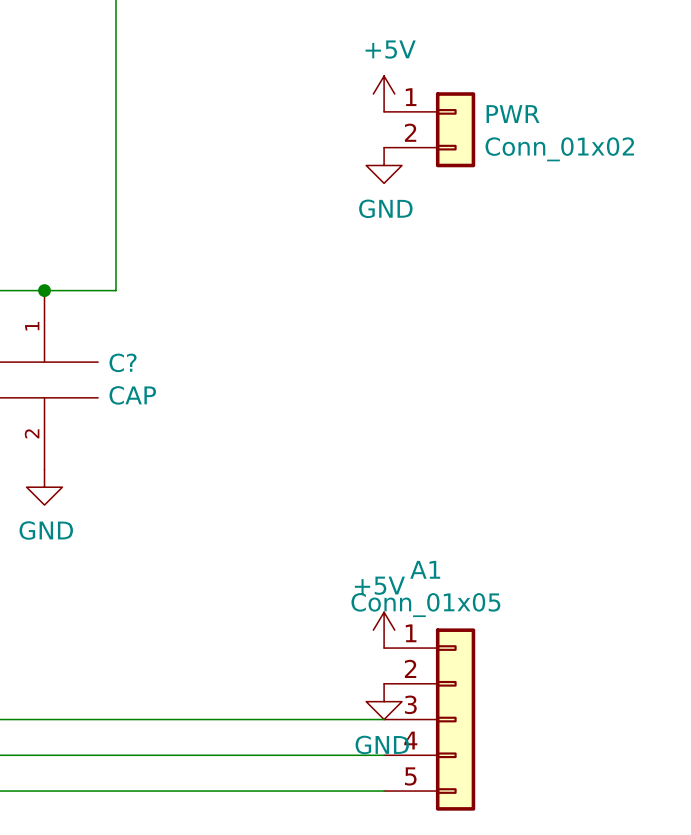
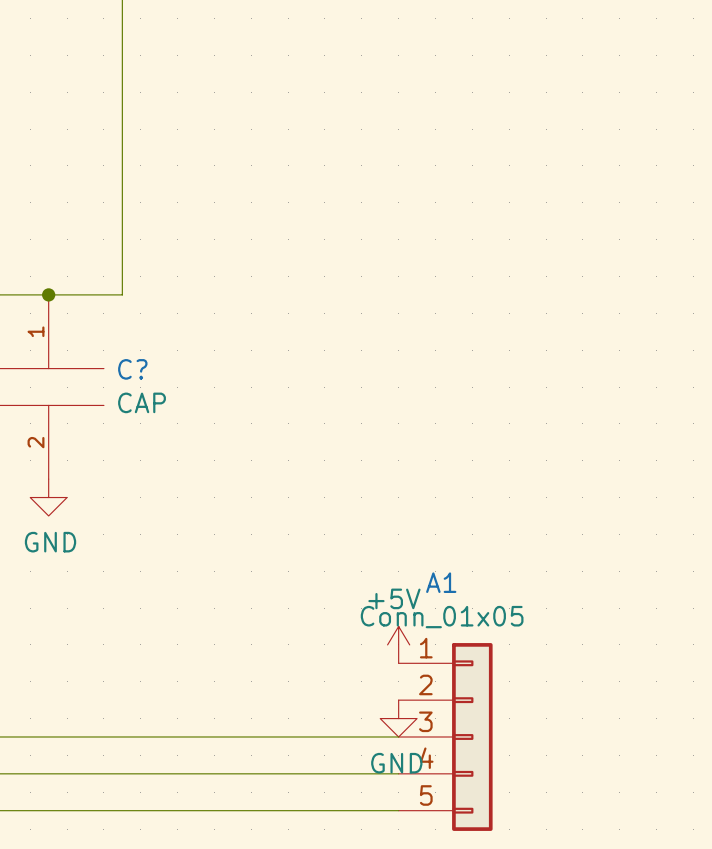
power symbol: +5V (384, 94) -> none
PWR: Conn_01x02 (429, 129) -> none
power symbol: GND (384, 165) -> none

